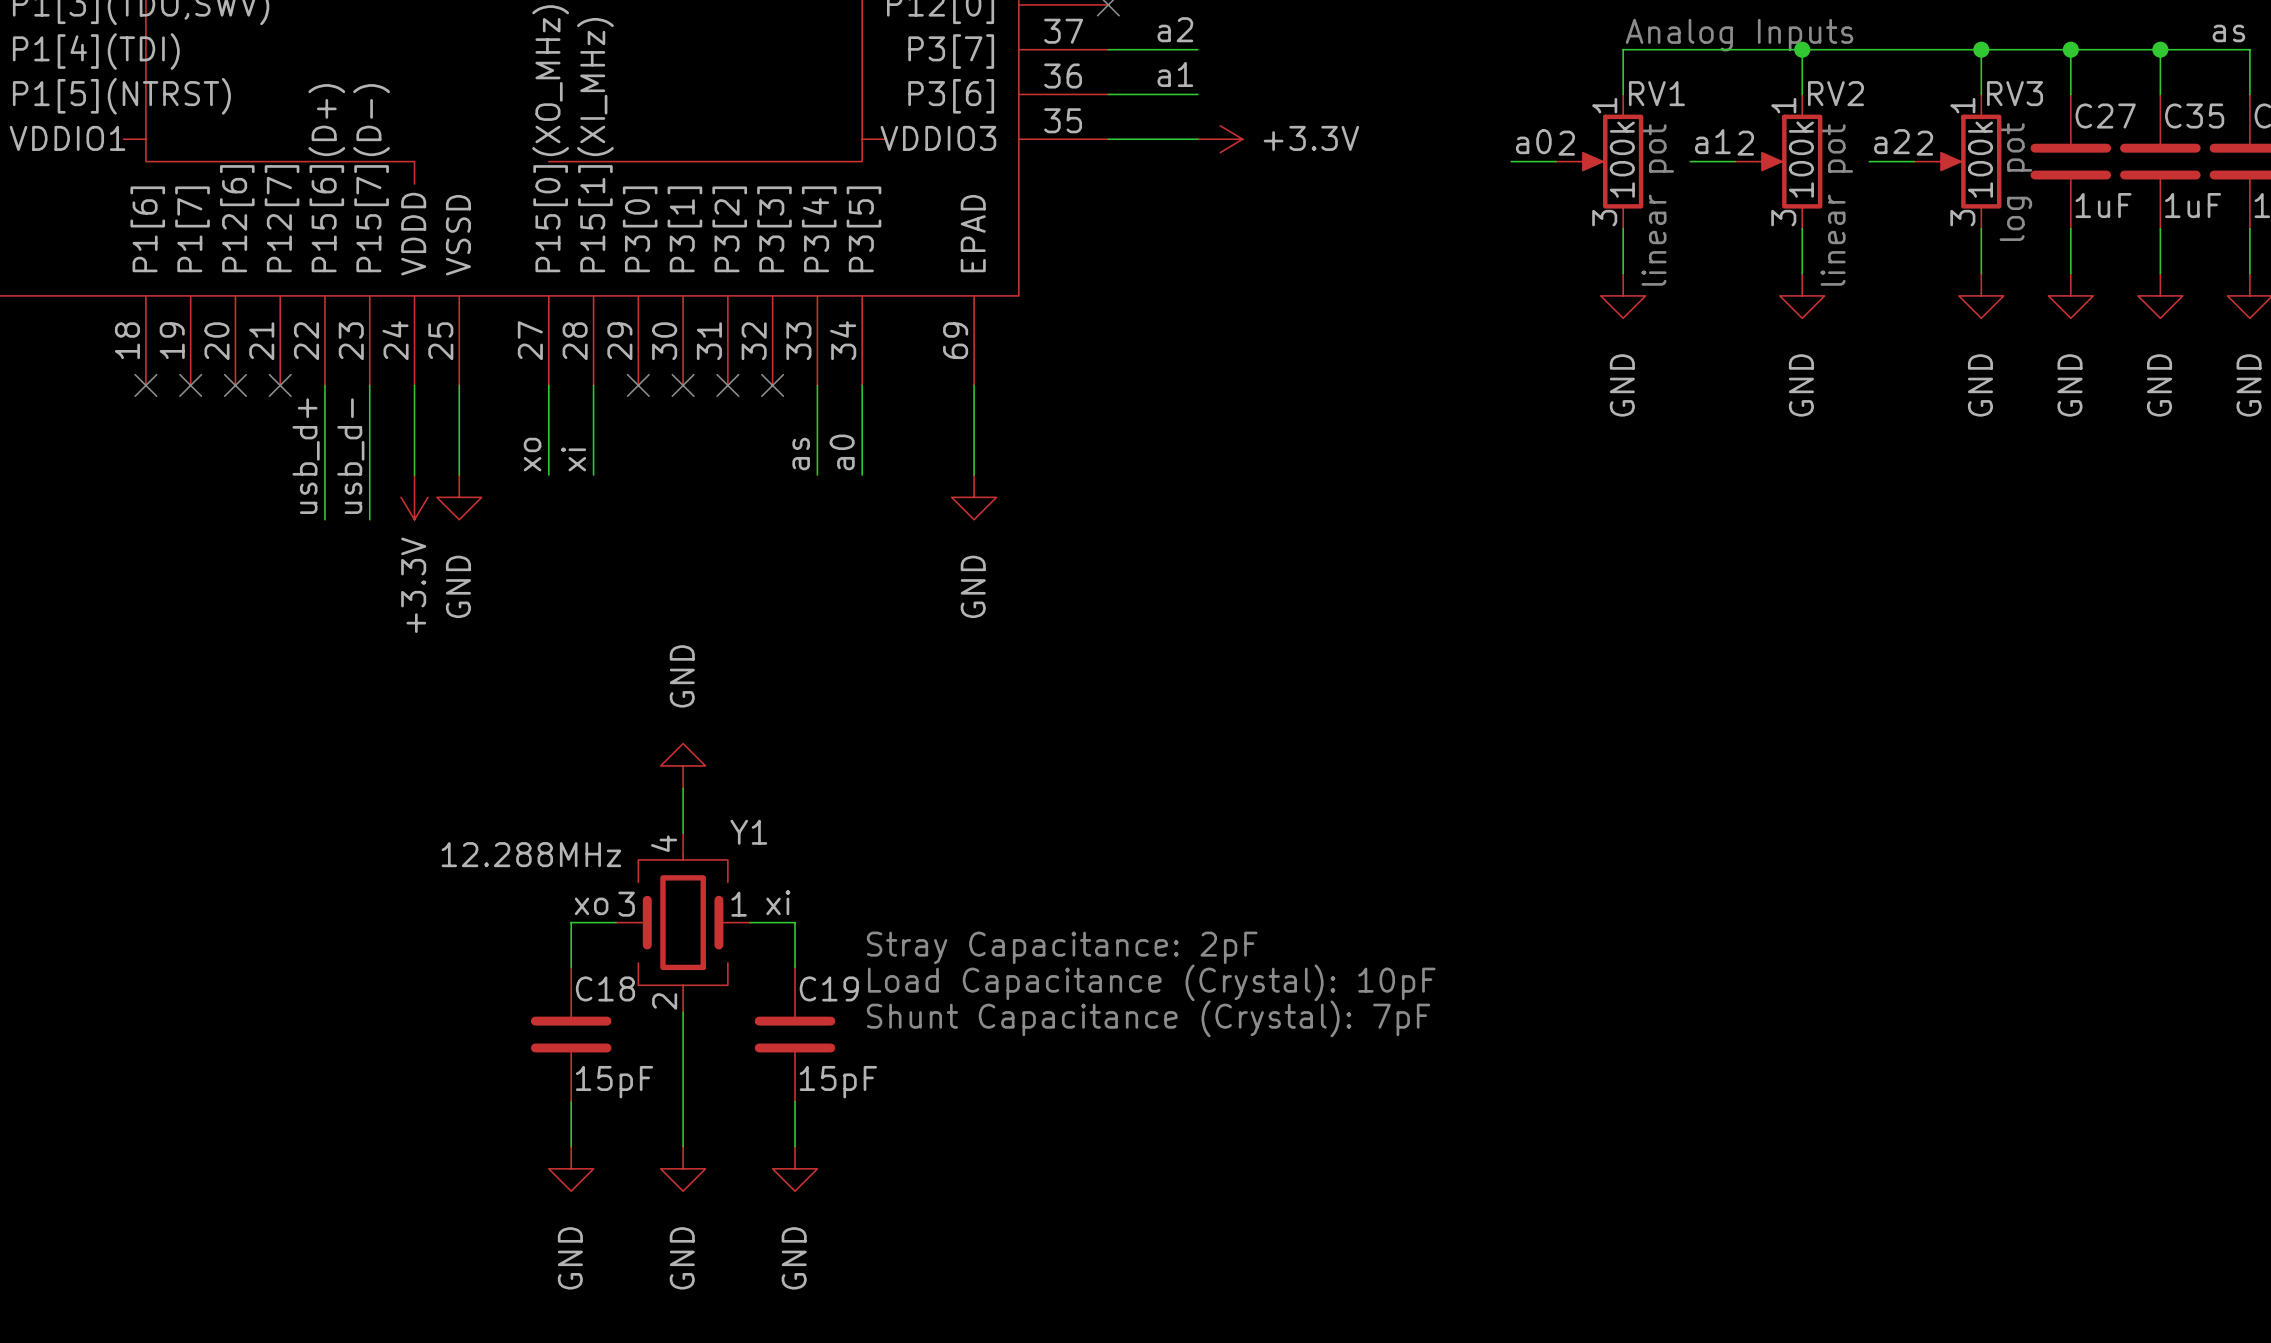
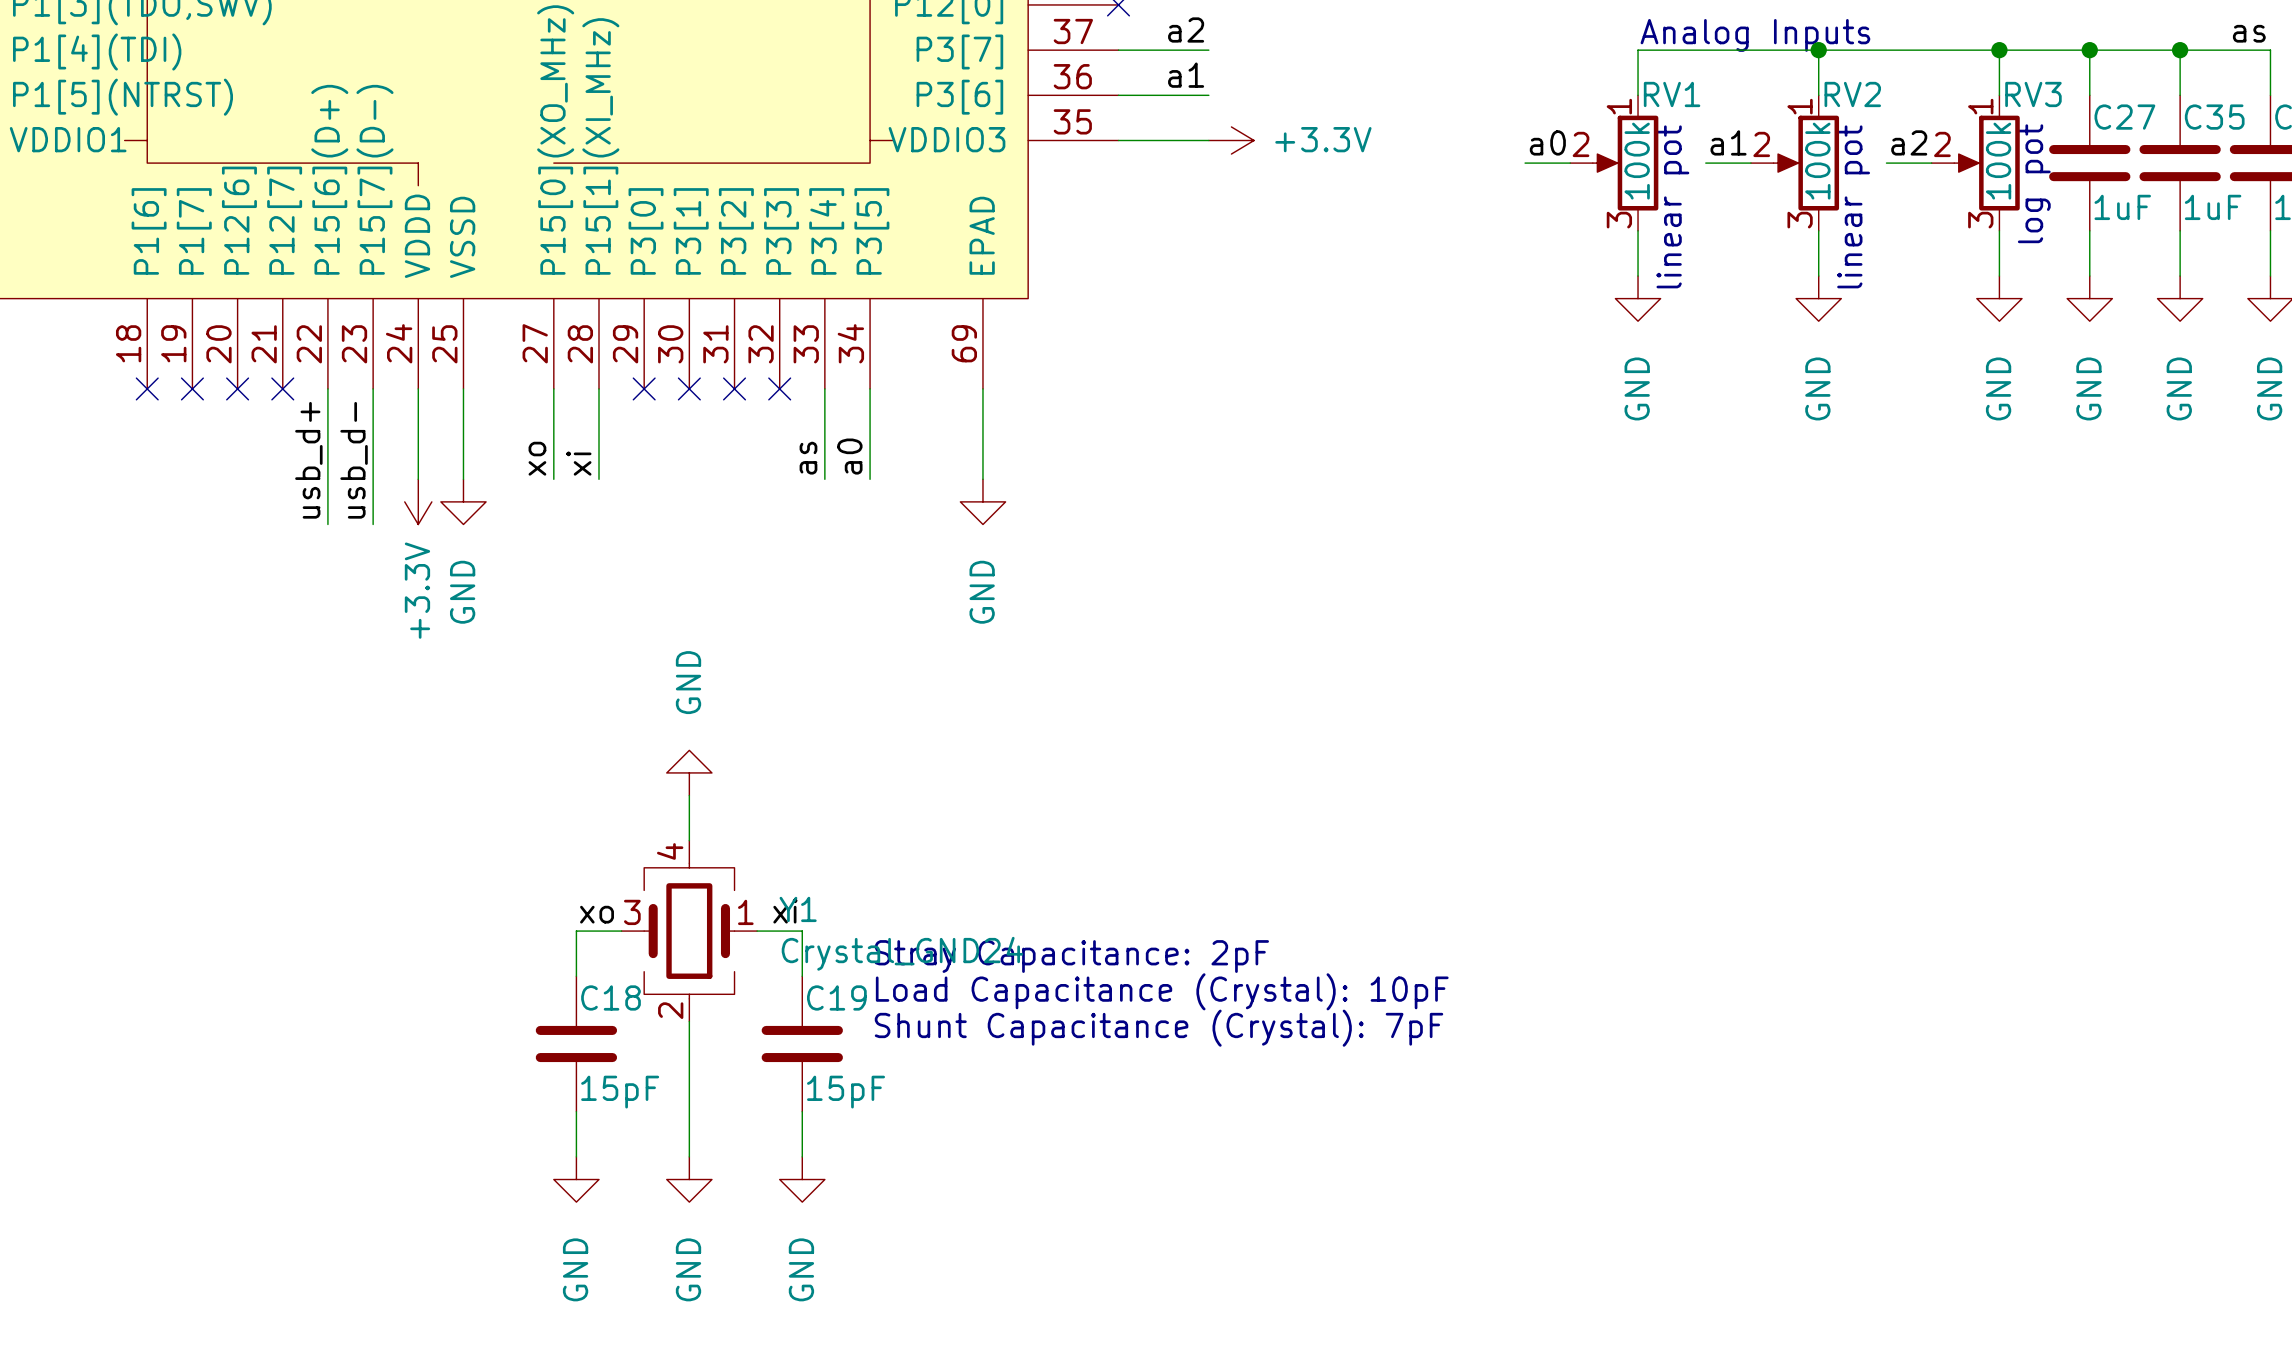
Y1 name position: Y1 (748, 832) -> Y1 (798, 909)
Y1 value: 12.288MHz (531, 854) -> Crystal_GND24 (902, 953)

